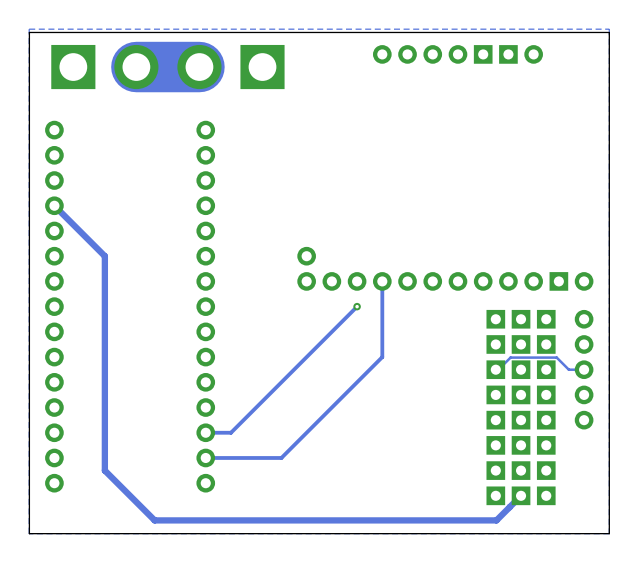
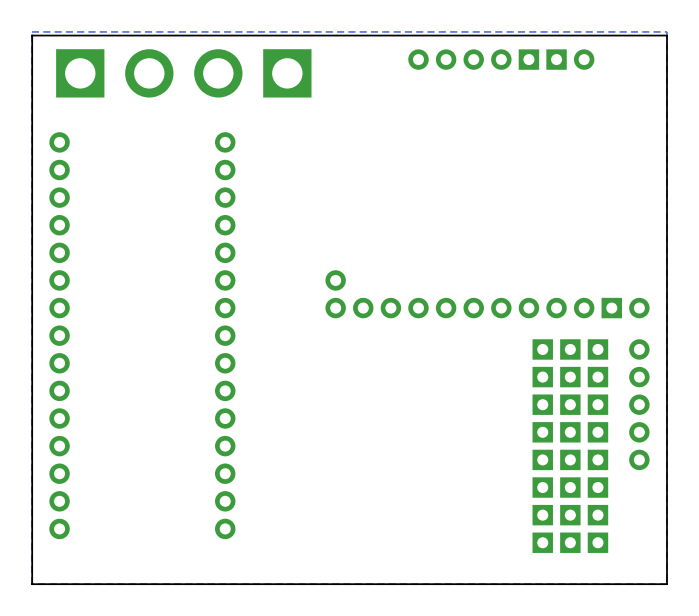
track: (199, 67) (136, 67) -> none
track: (54, 205) (104, 256) (104, 470) (154, 520) (496, 520) (521, 495) -> none
track: (382, 281) (382, 357) (281, 457) (205, 457) -> none
track: (357, 306) (230, 432) (205, 432) -> none
via: (357, 306) -> none
track: (584, 369) (568, 369) (556, 357) (510, 357) (498, 369) (495, 369) -> none

